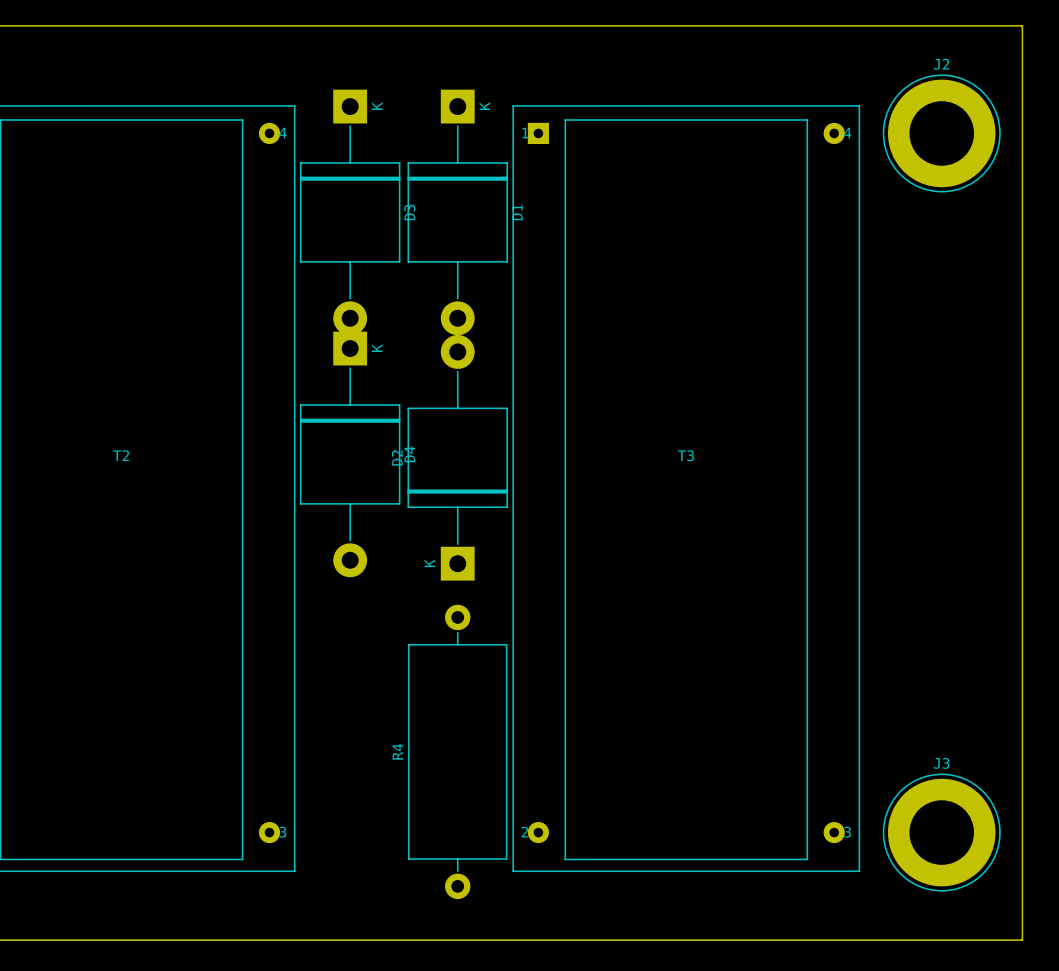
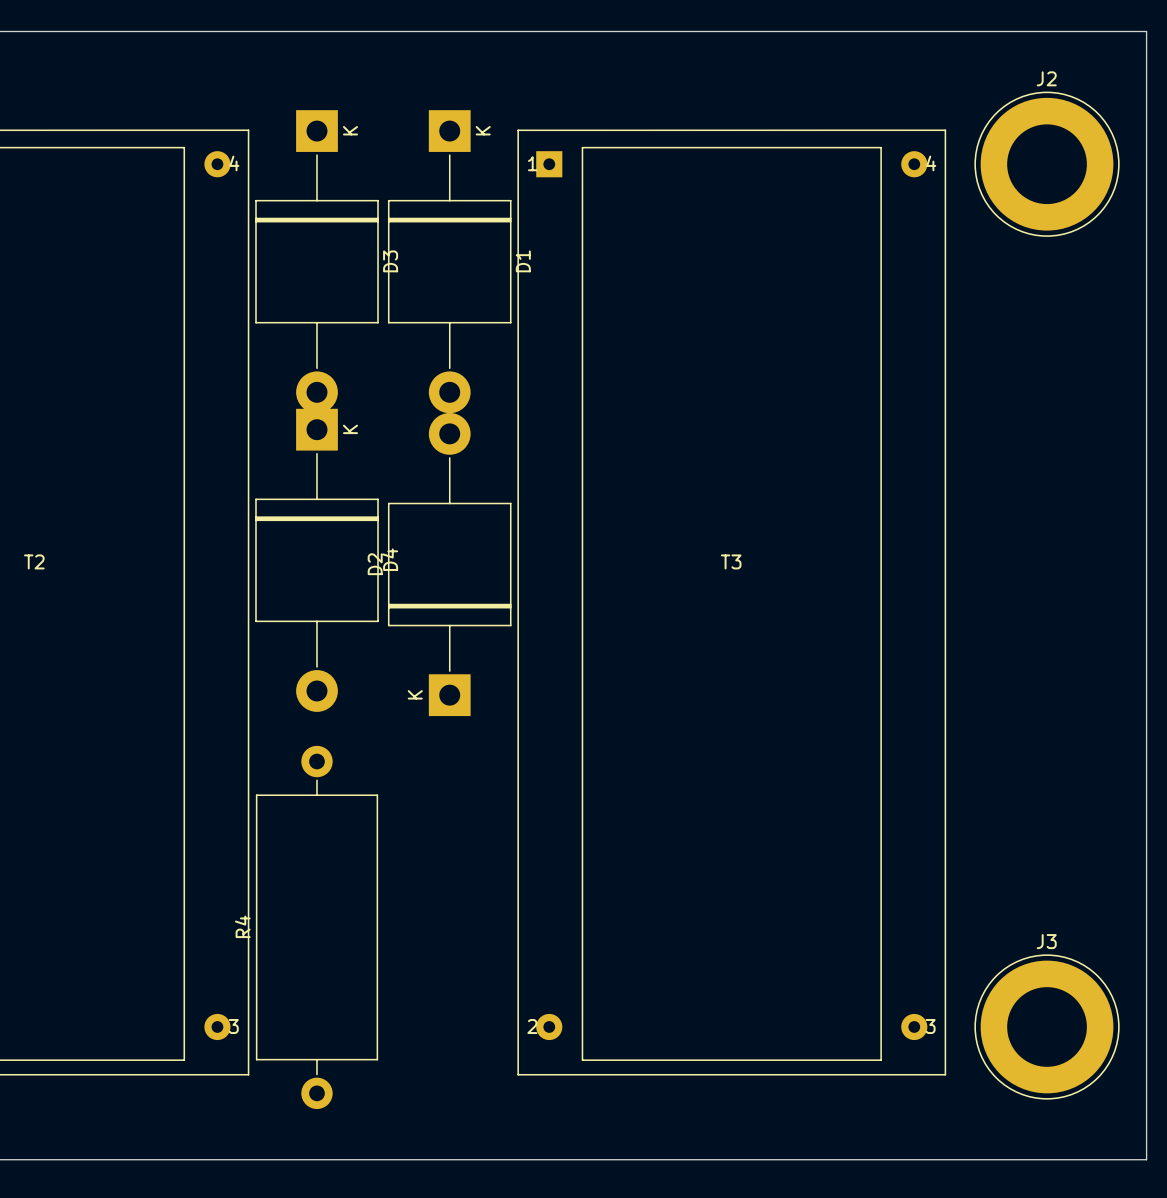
R4 position: (457, 751) -> (317, 927)

